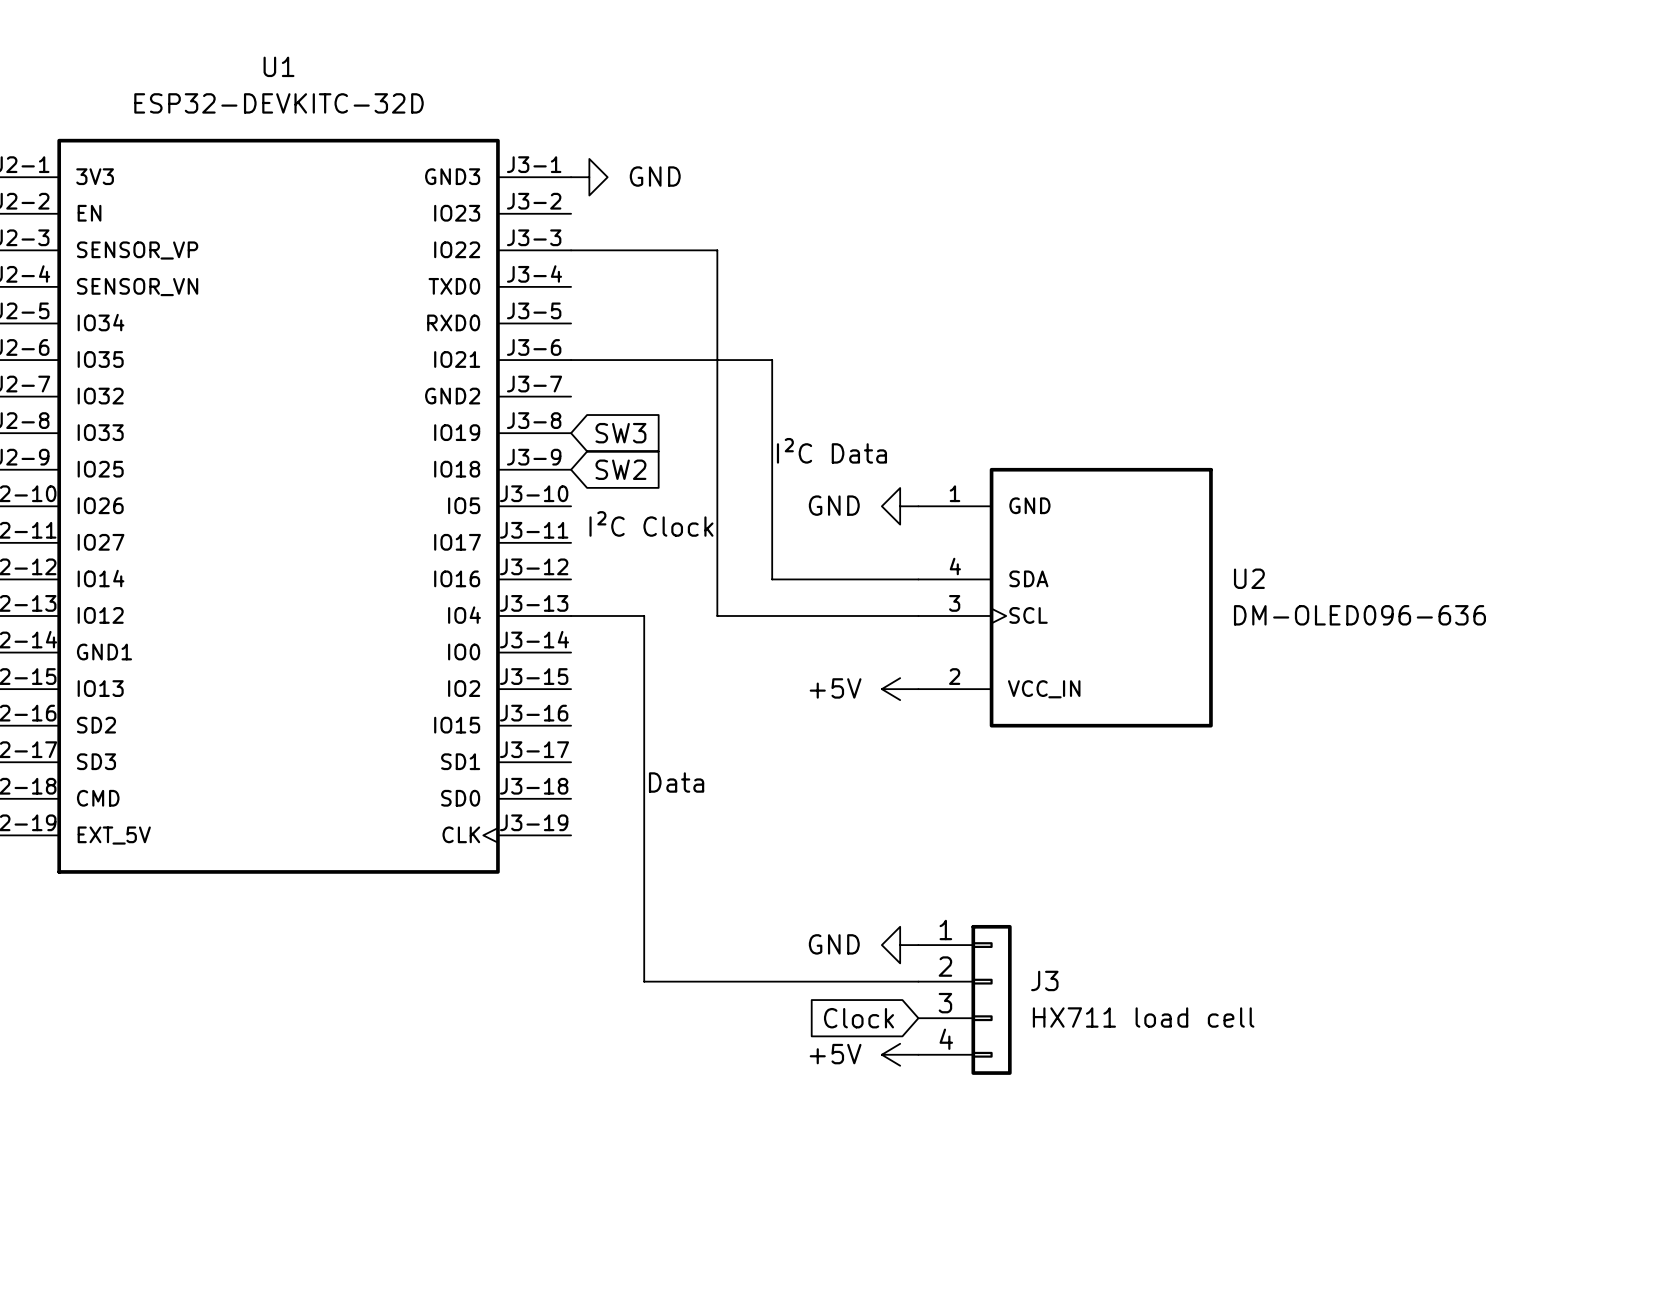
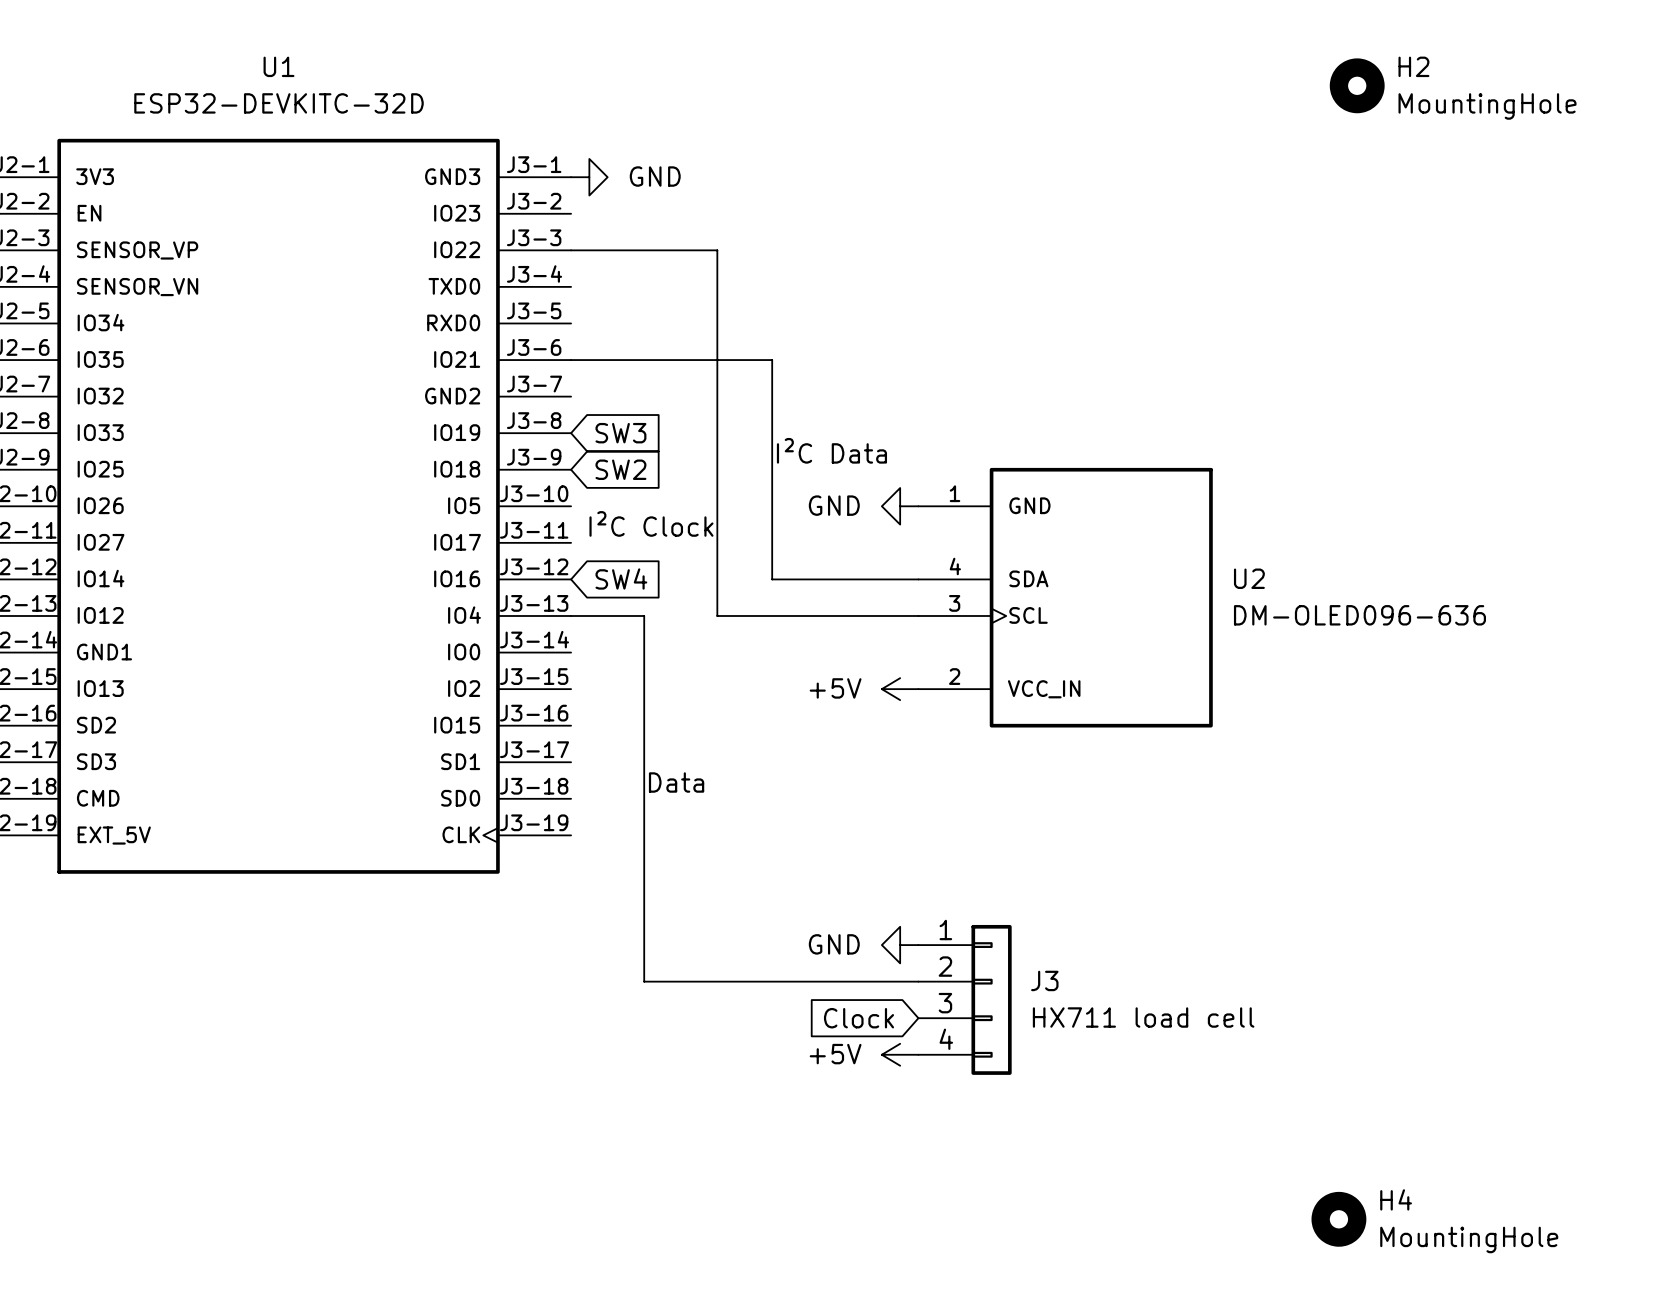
H2: none -> MountingHole (1357, 85)
global label: none -> SW4 (621, 578)
H4: none -> MountingHole (1338, 1219)

